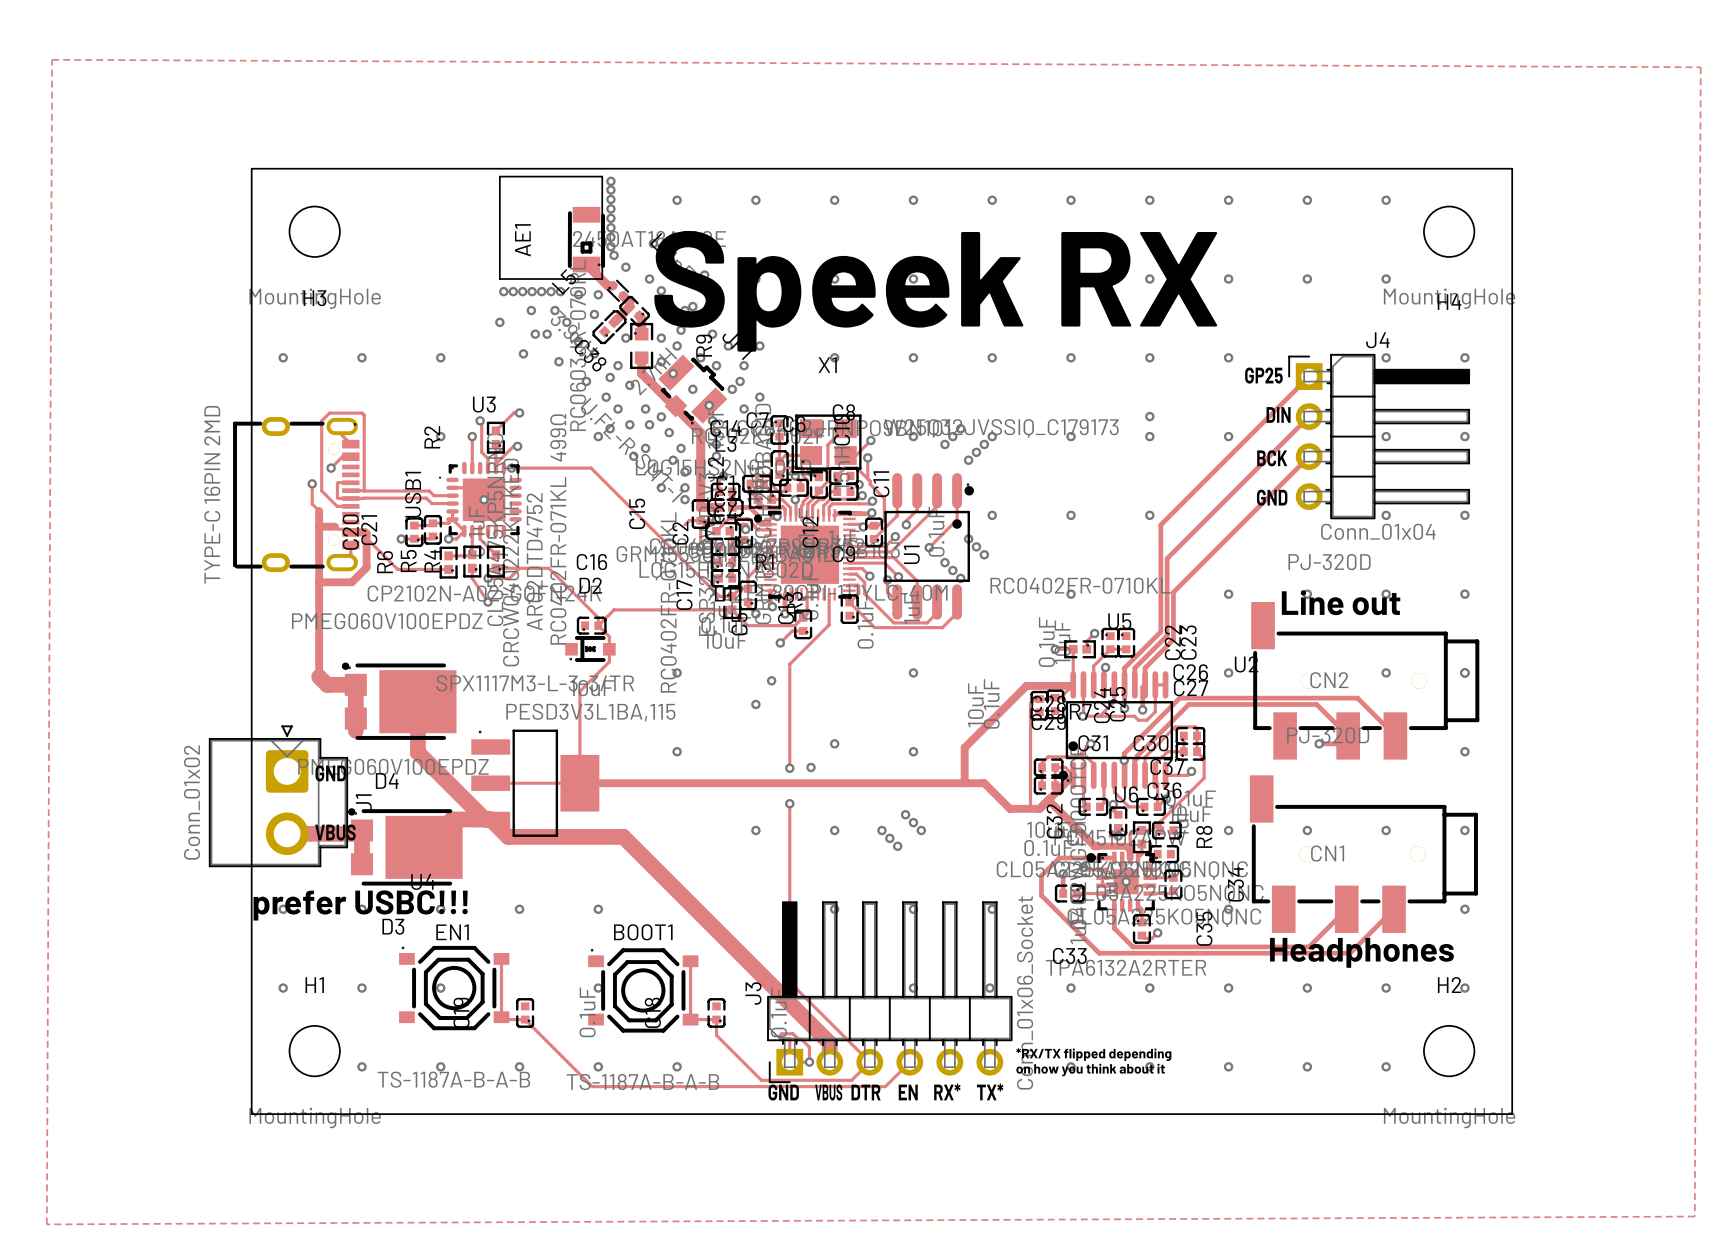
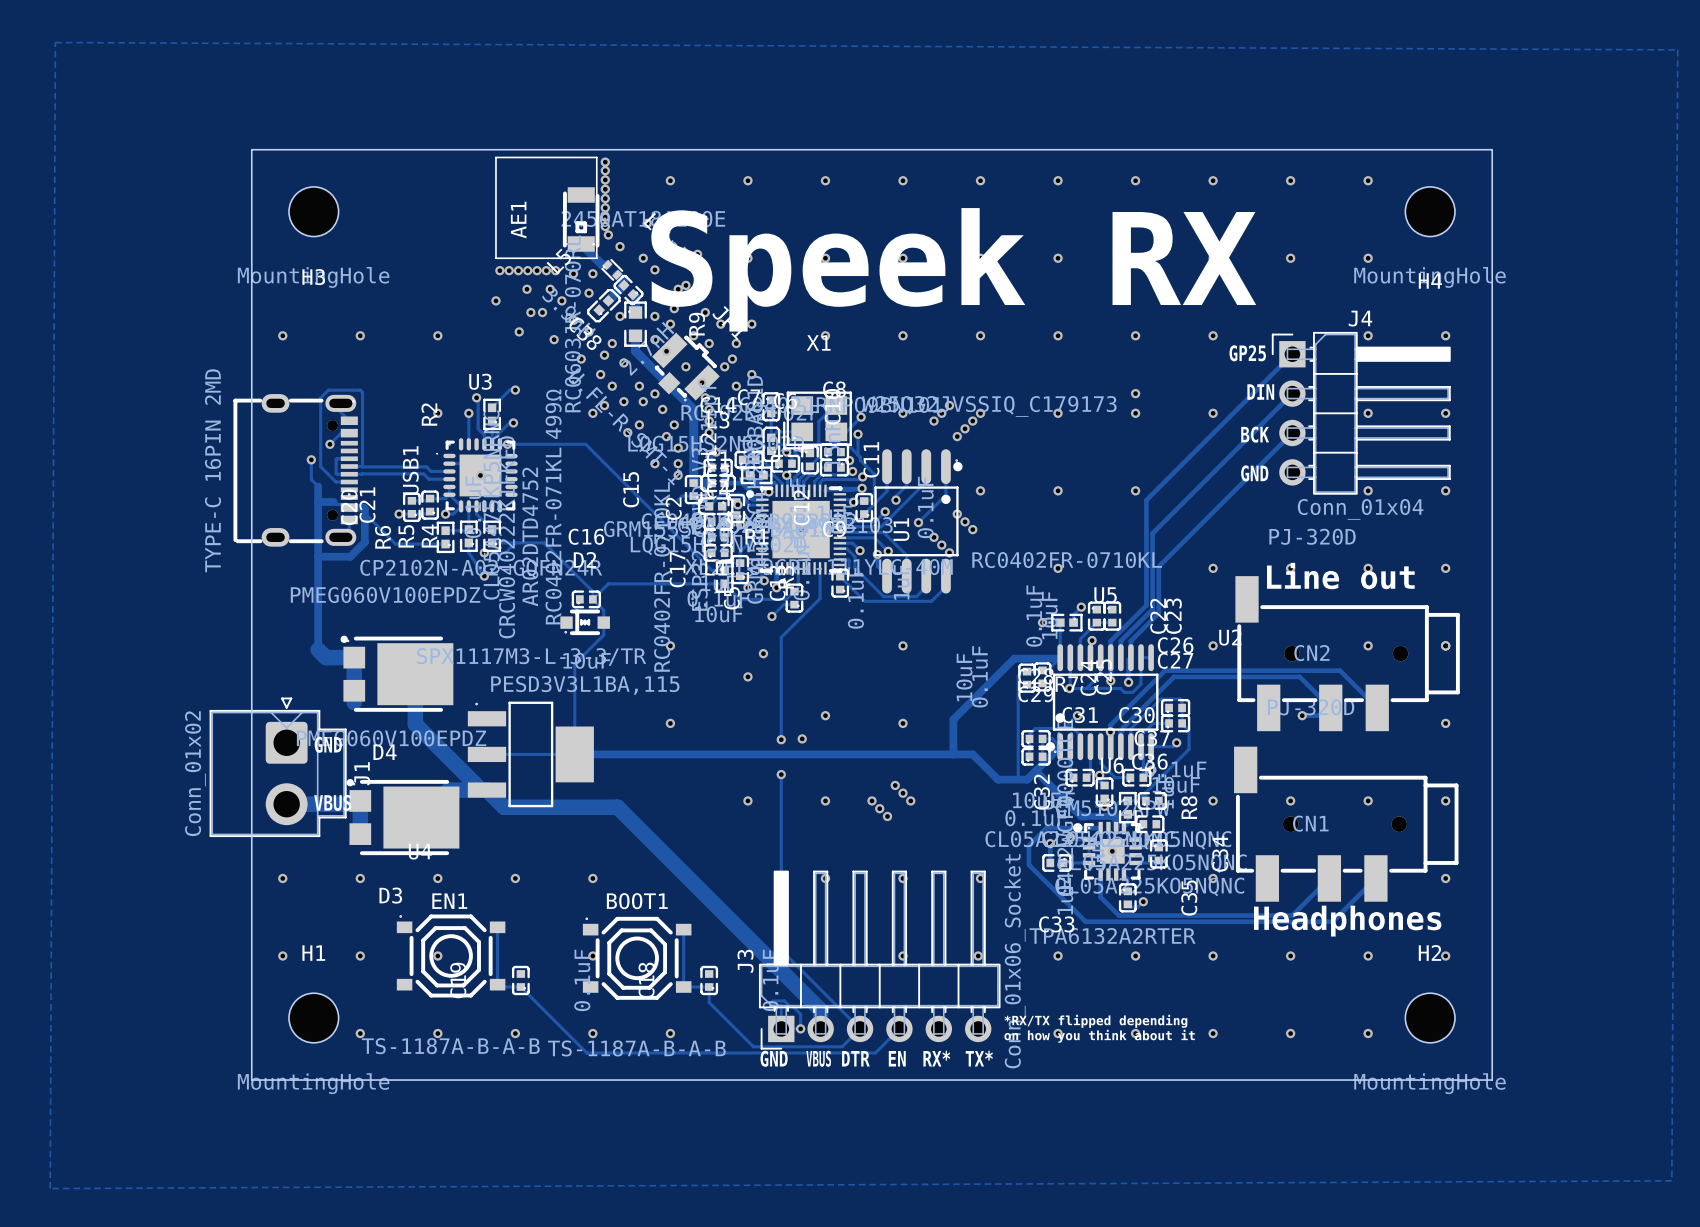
text: prefer USBC!!! (360, 905) -> none

